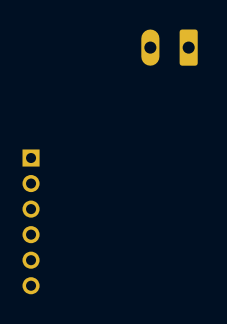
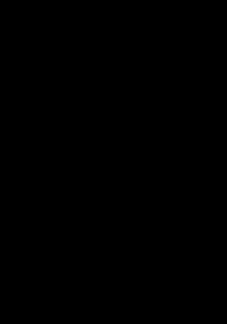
part: (169, 47) -> none
part: (31, 221) -> none

